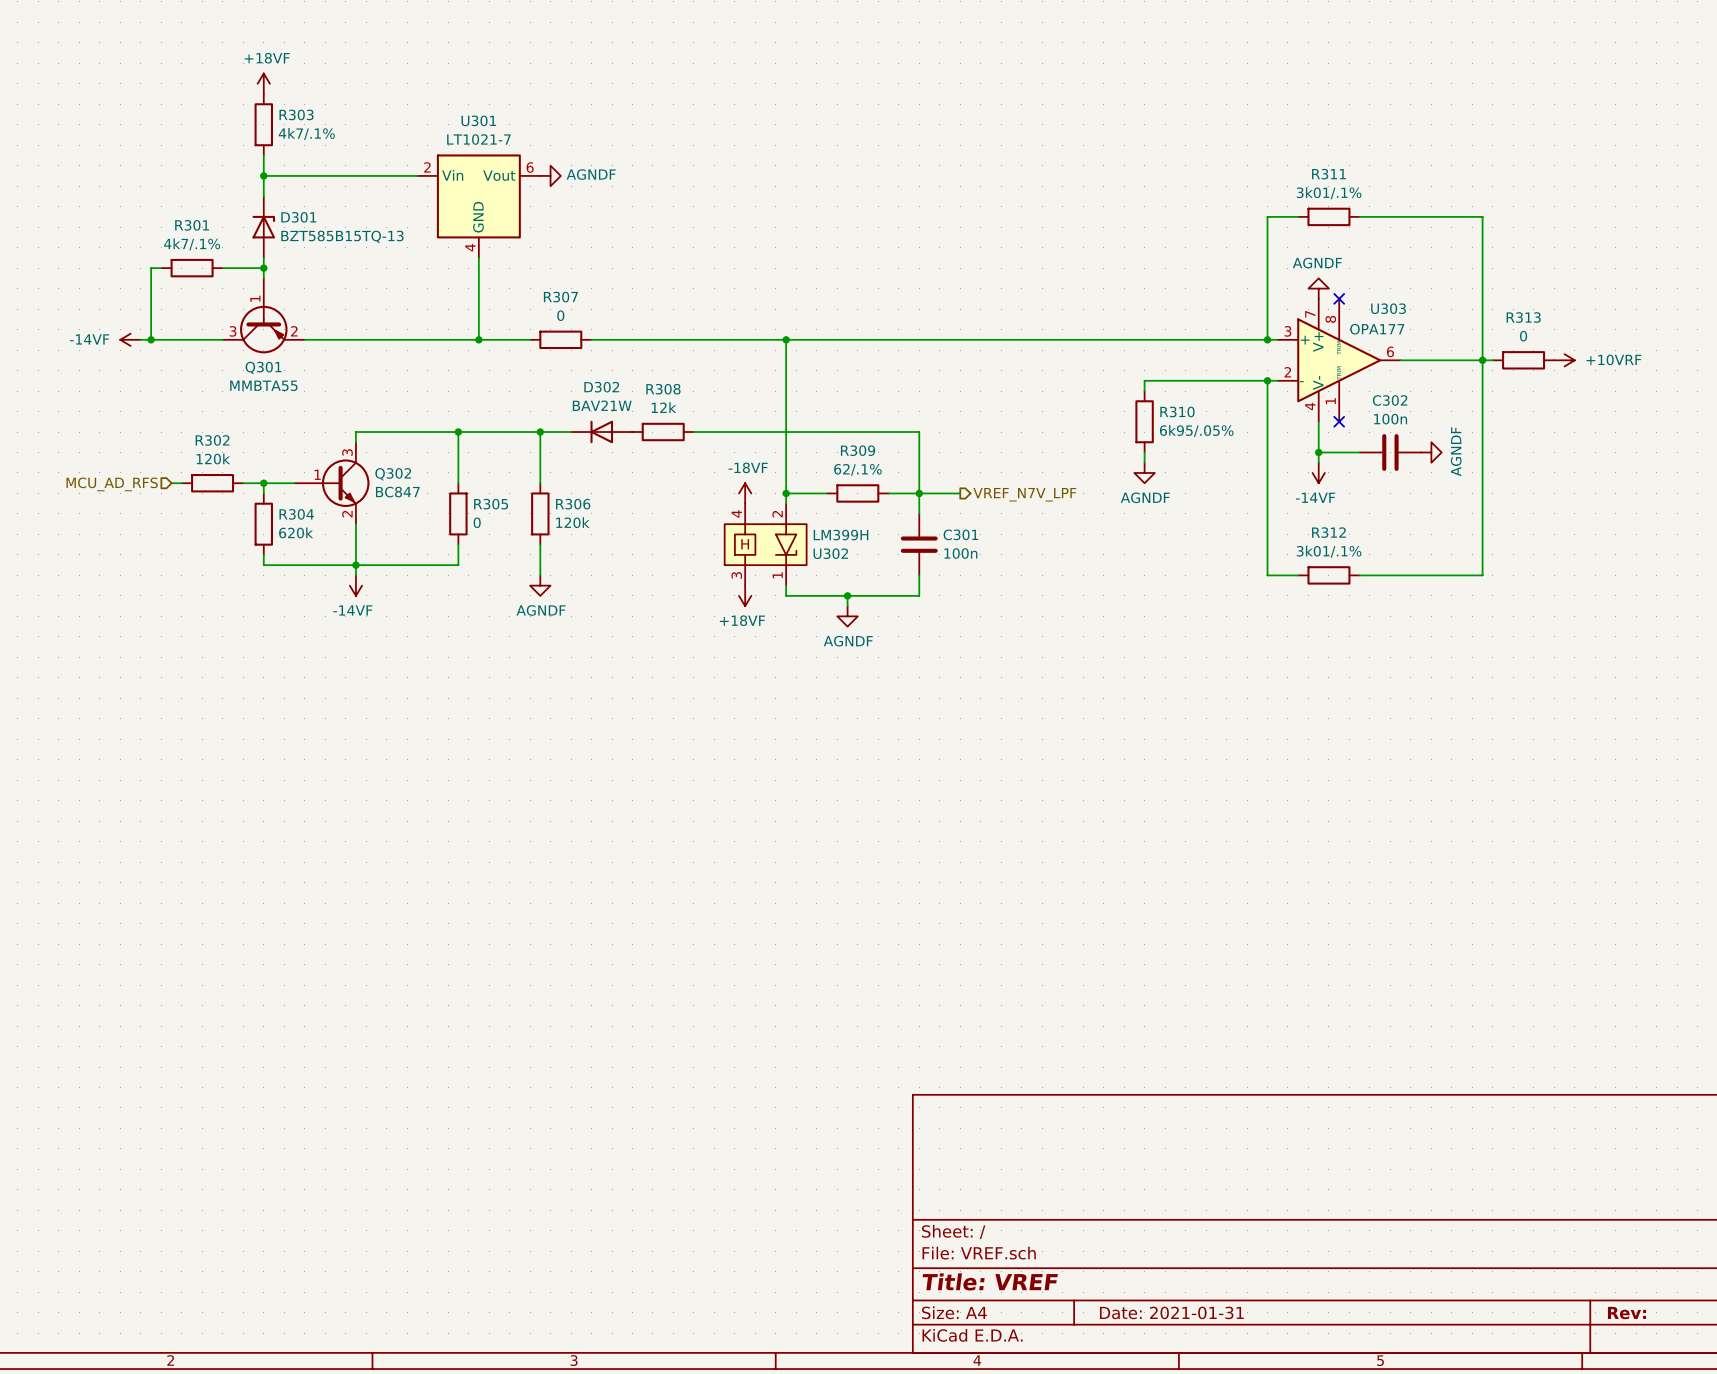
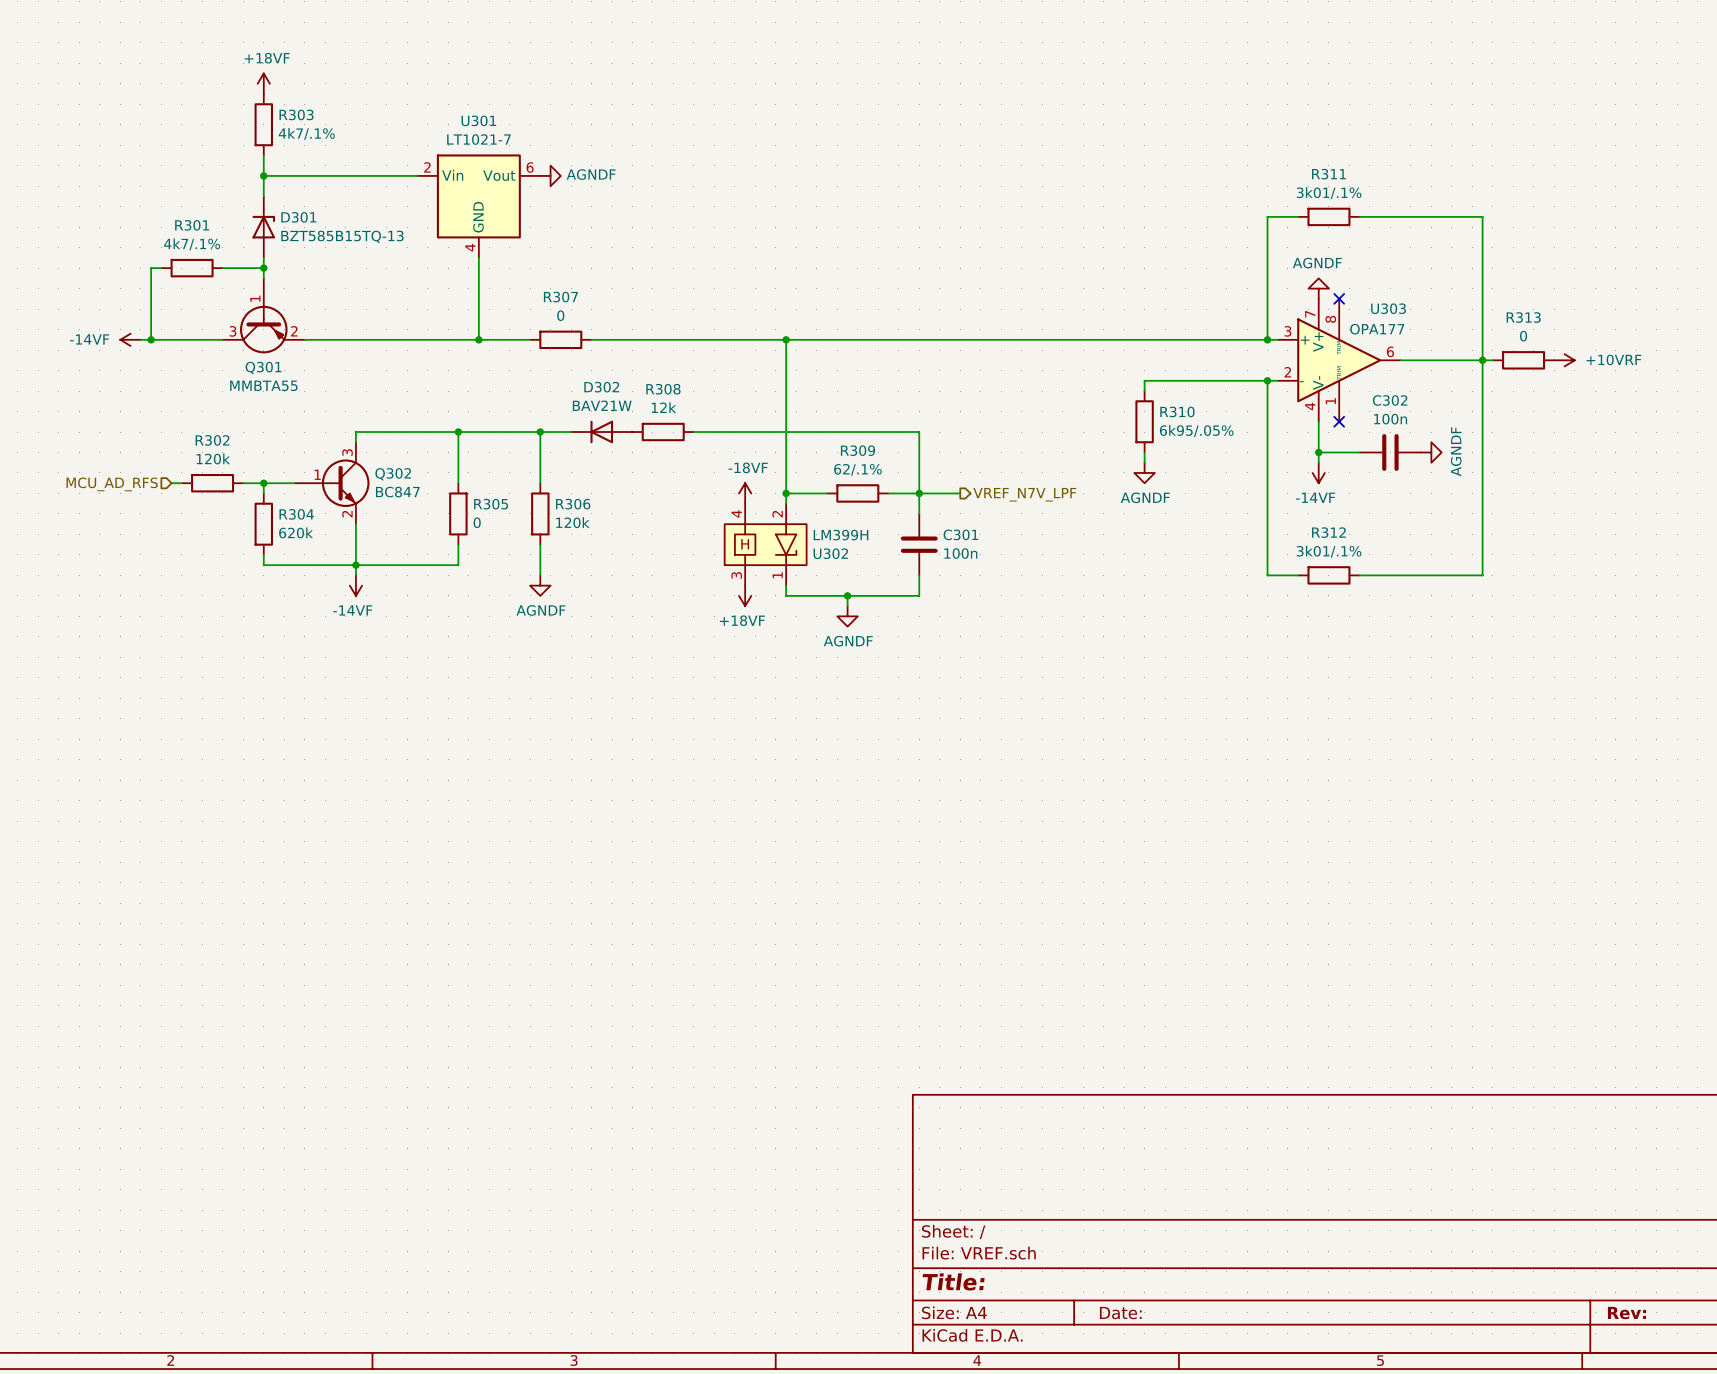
title block: Title: VREF (990, 1281) -> Title: (953, 1281)
title block: Date: 2021-01-31 (1171, 1312) -> Date: (1120, 1313)

